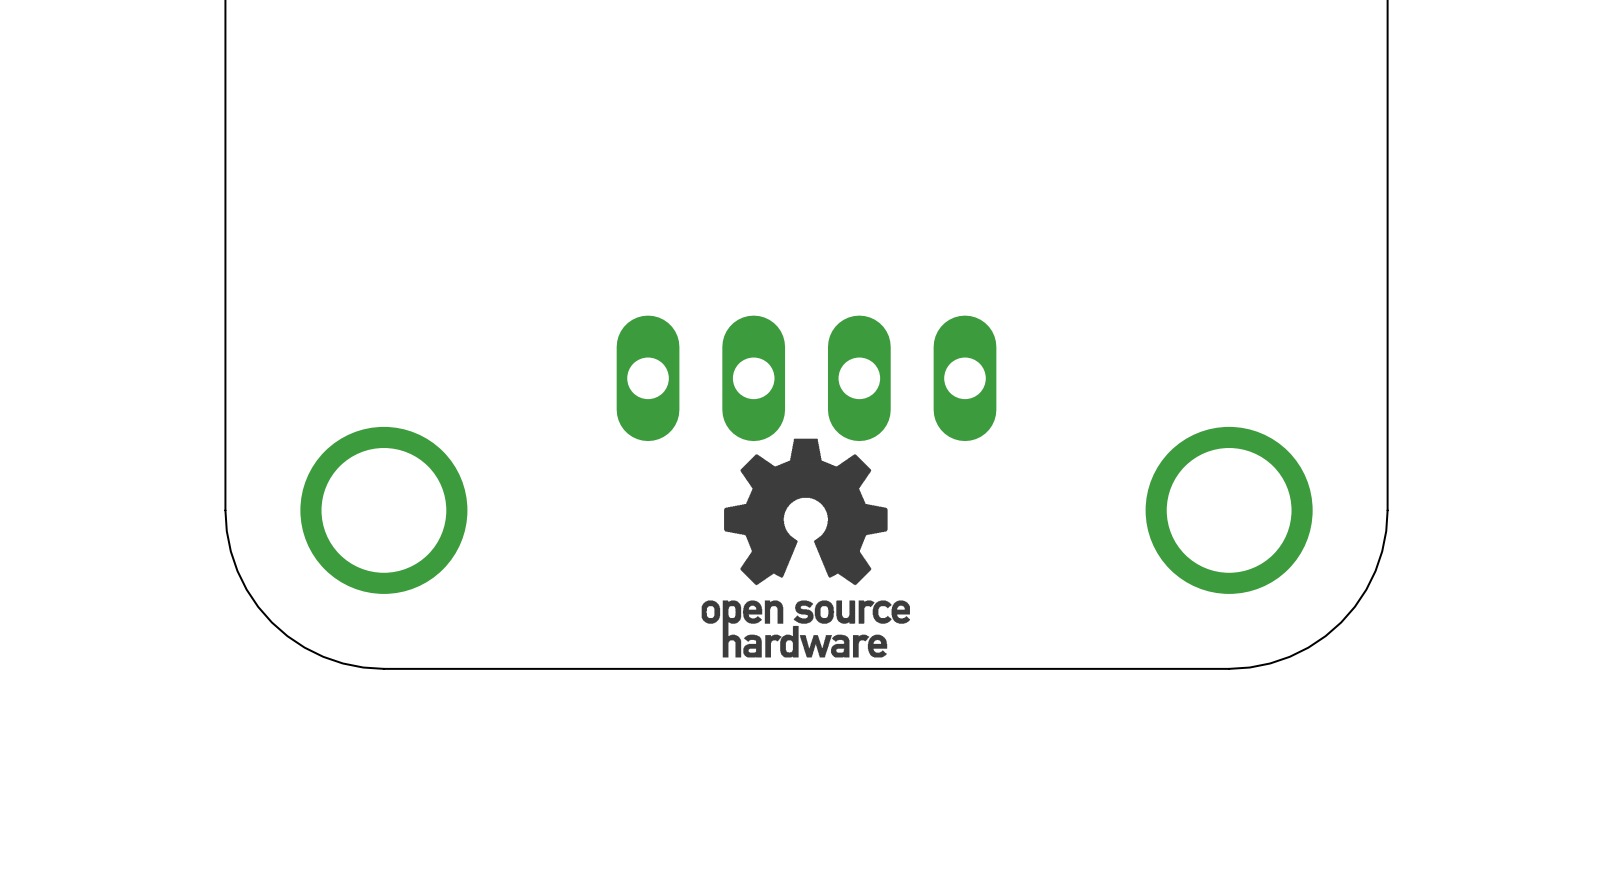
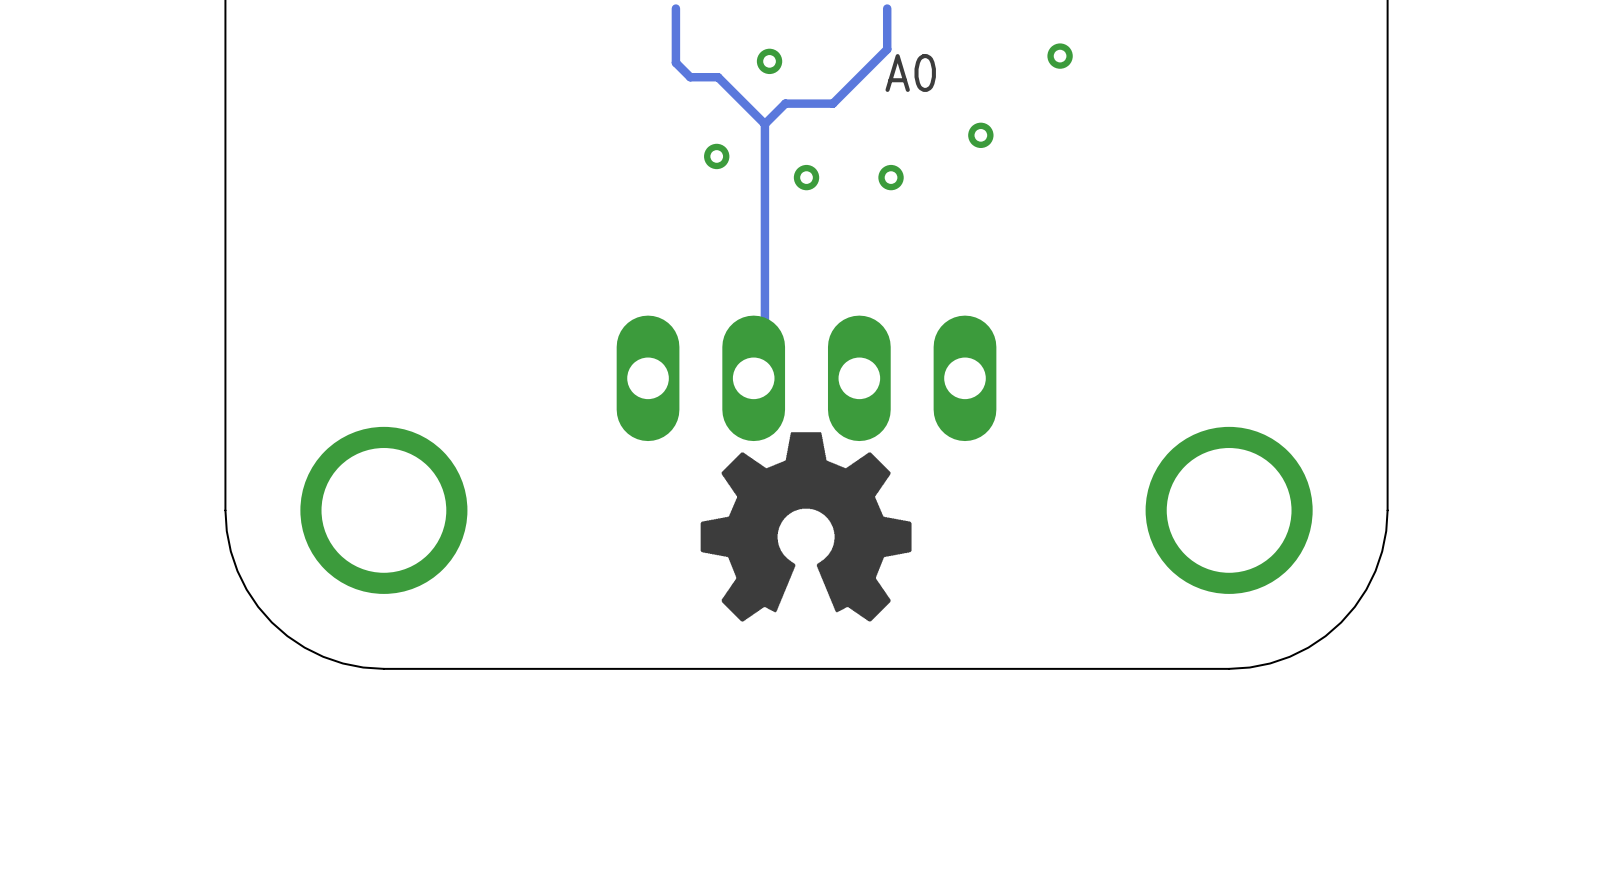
track: none -> (675, 8) (675, 62) (690, 77) (718, 77) (764, 124)
track: none -> (887, 8) (887, 49) (832, 103) (785, 103) (764, 124)
via: none -> (1060, 56)
via: none -> (769, 61)
text: none -> A0 (910, 72)
track: none -> (764, 124) (764, 325)
via: none -> (980, 135)
via: none -> (716, 156)
via: none -> (806, 177)
via: none -> (891, 177)
drawing shape: [701, 438, 910, 658] -> [700, 432, 912, 622]

